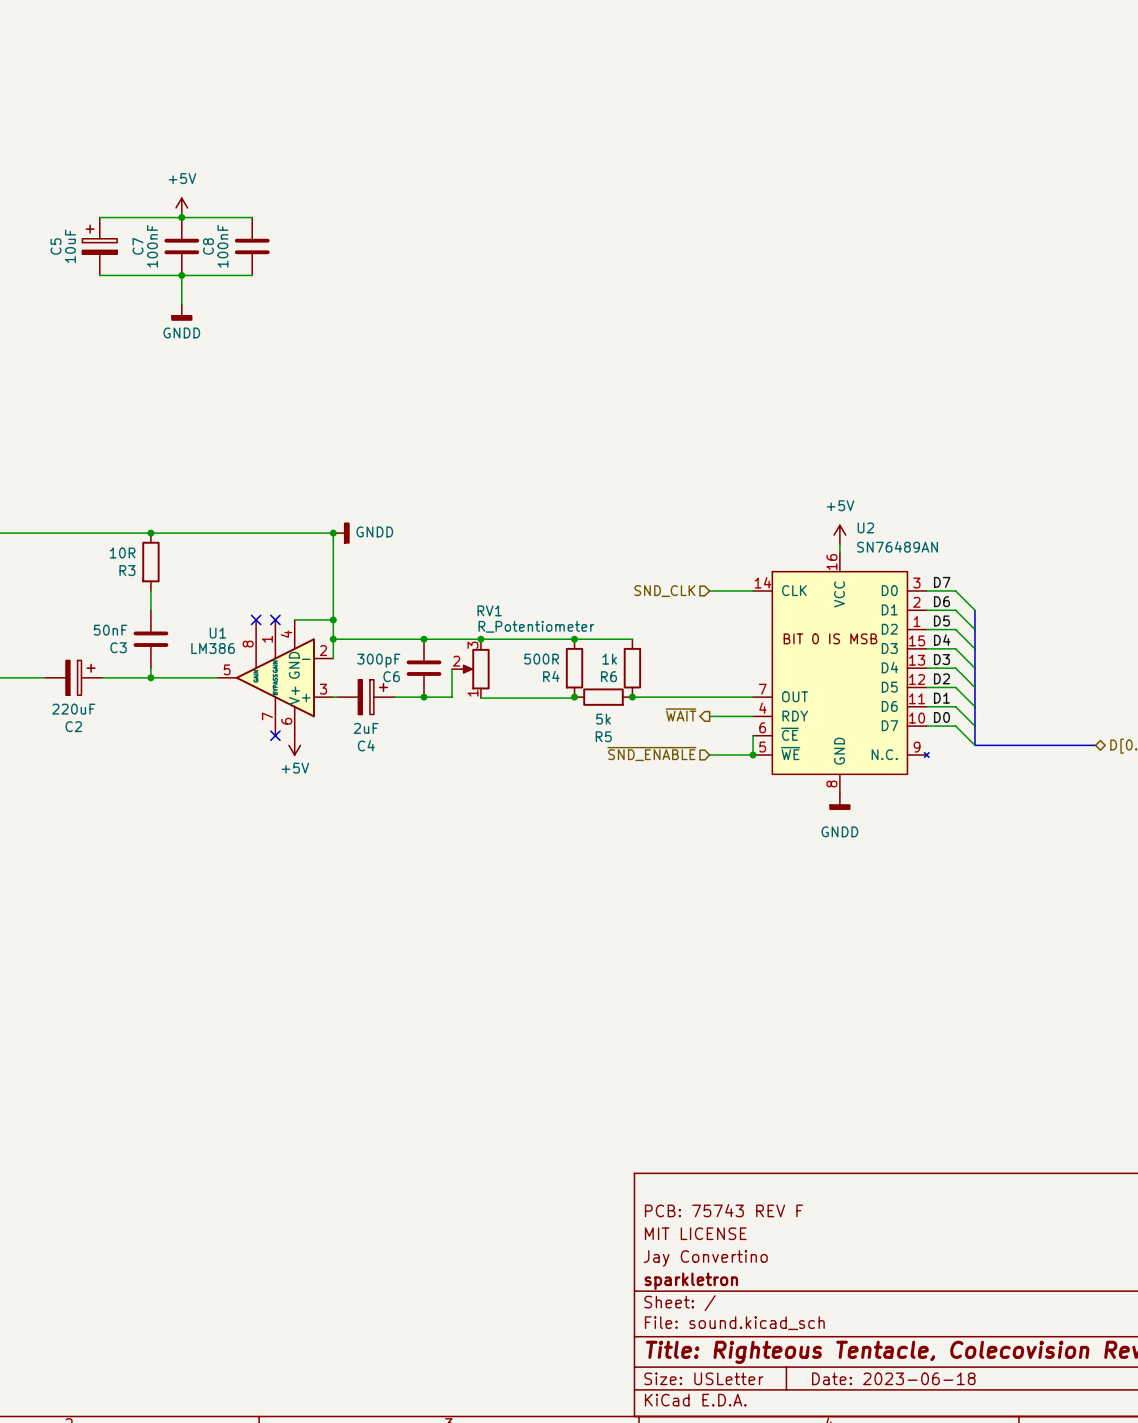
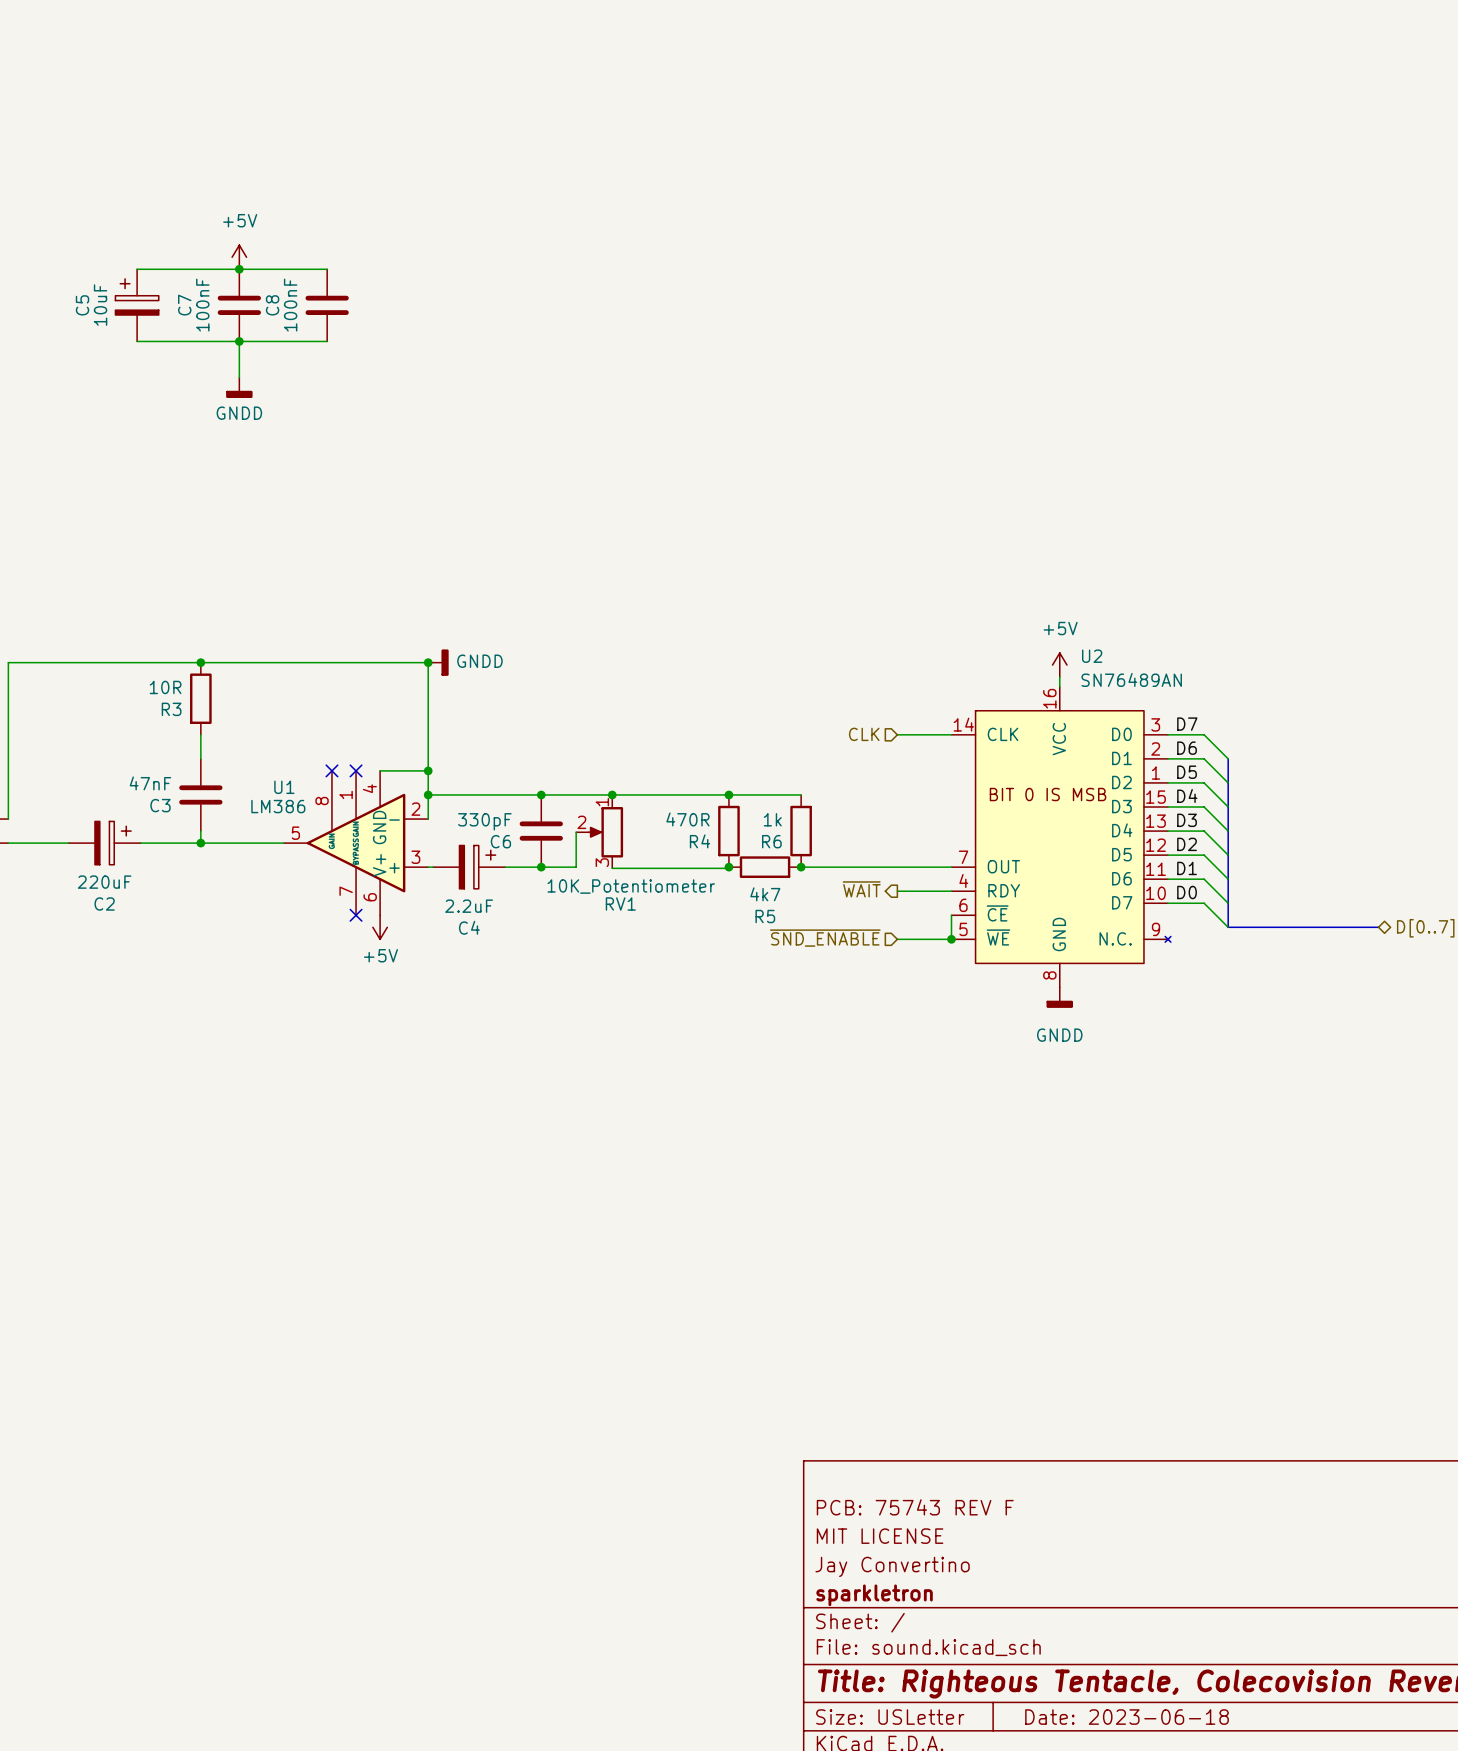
hierarchical label: SND_CLK (664, 591) -> CLK (864, 734)
RV1 value: R_Potentiometer (536, 626) -> 10K_Potentiometer (631, 886)
C3 value: 50nF (110, 630) -> 47nF (150, 783)
R4 value: 500R (541, 659) -> 470R (687, 819)
C6 value: 300pF (378, 660) -> 330pF (484, 821)
RV1 flip: as is (475, 669) -> up-down (605, 832)
R5 value: 5k (603, 719) -> 4k7 (765, 894)
C4 value: 2uF (366, 728) -> 2.2uF (469, 906)

